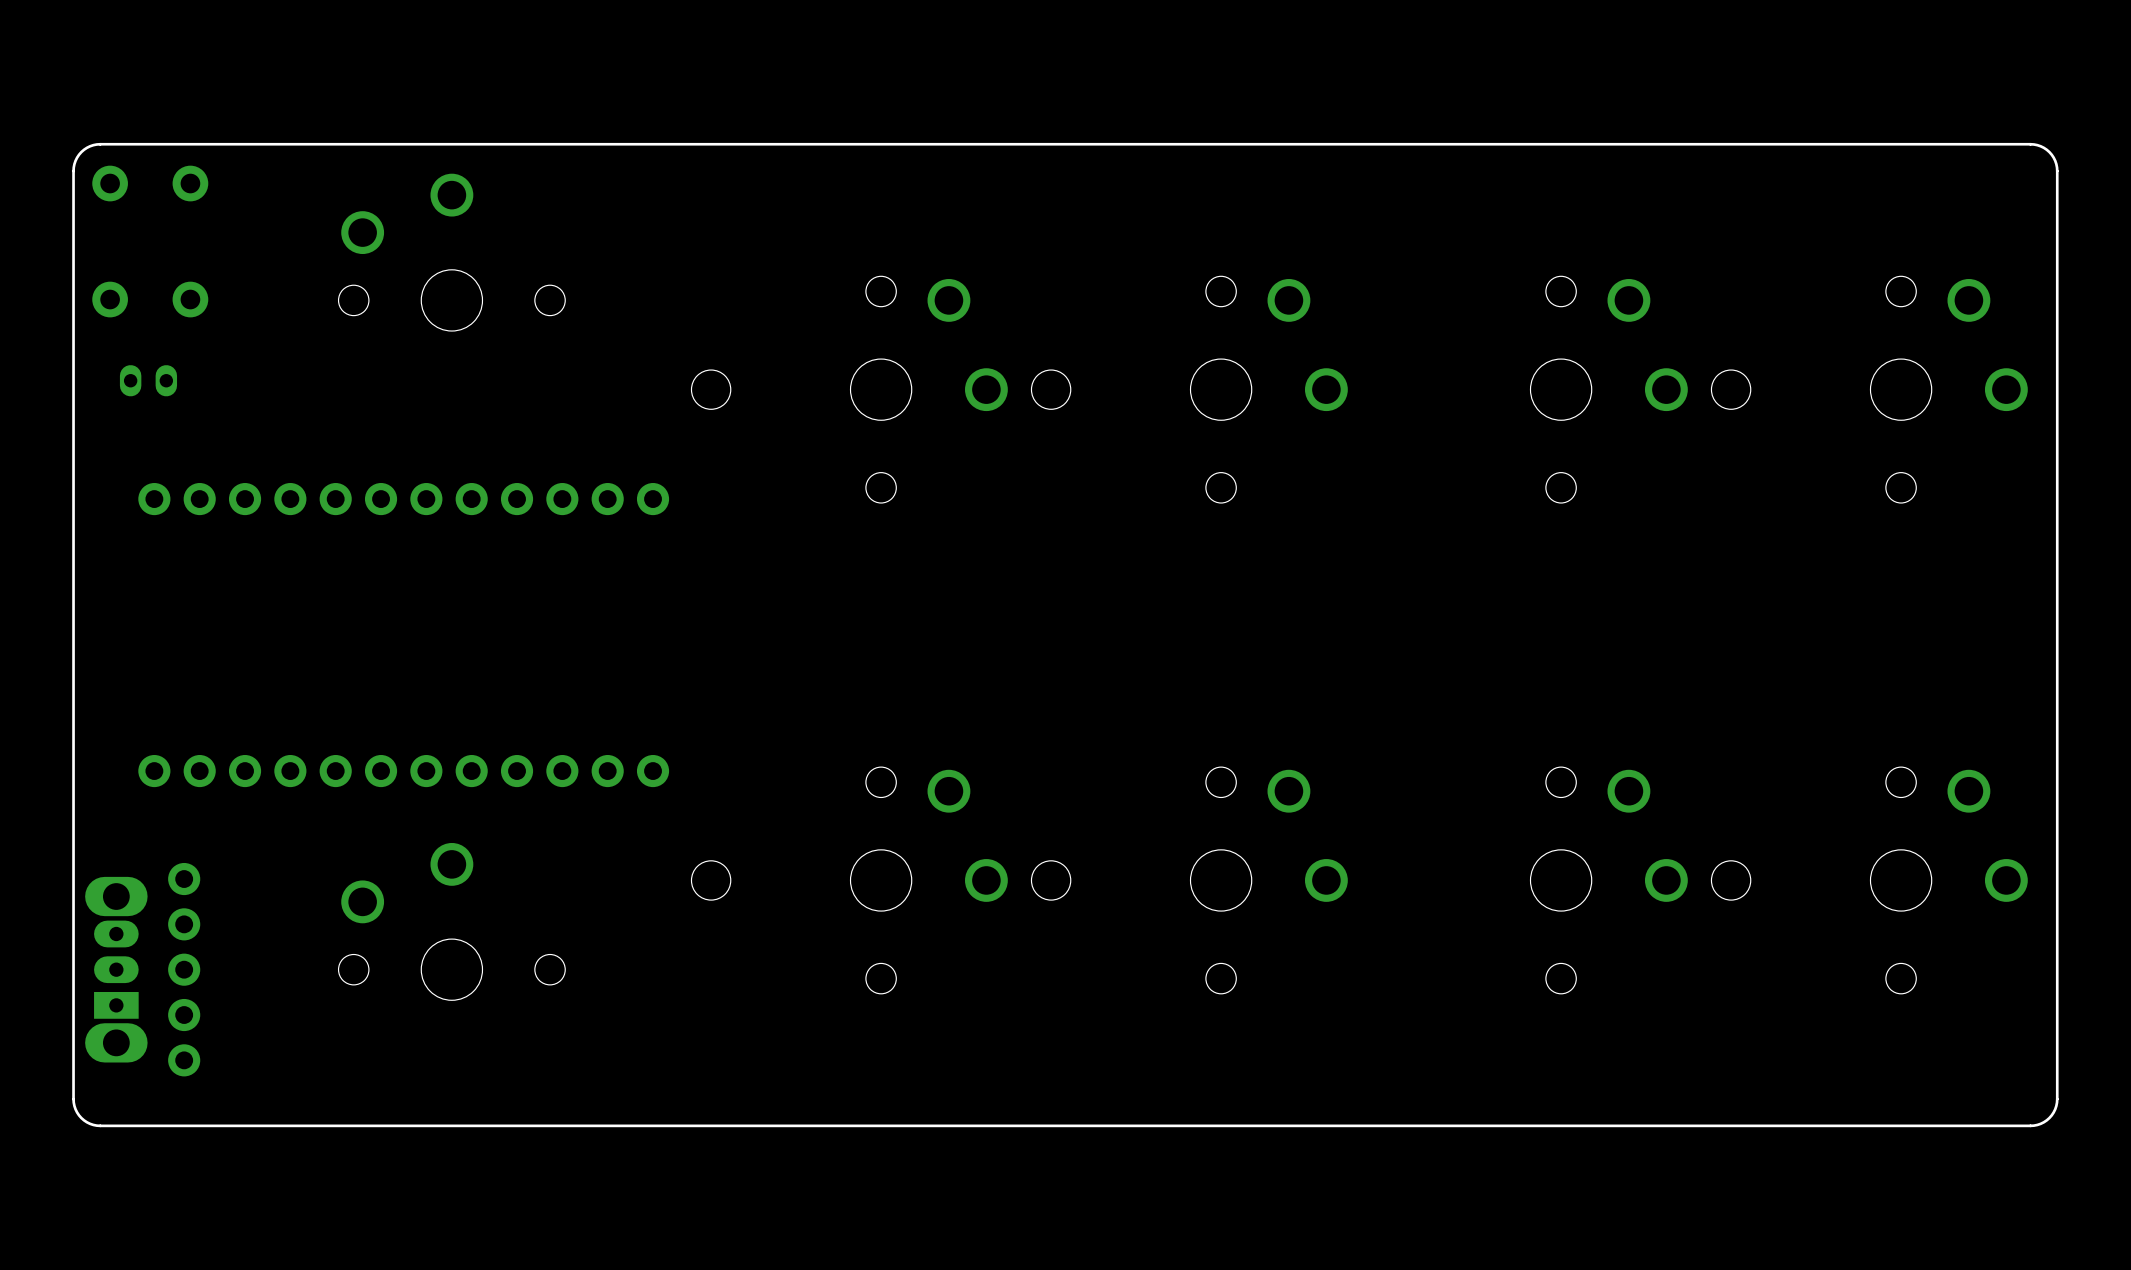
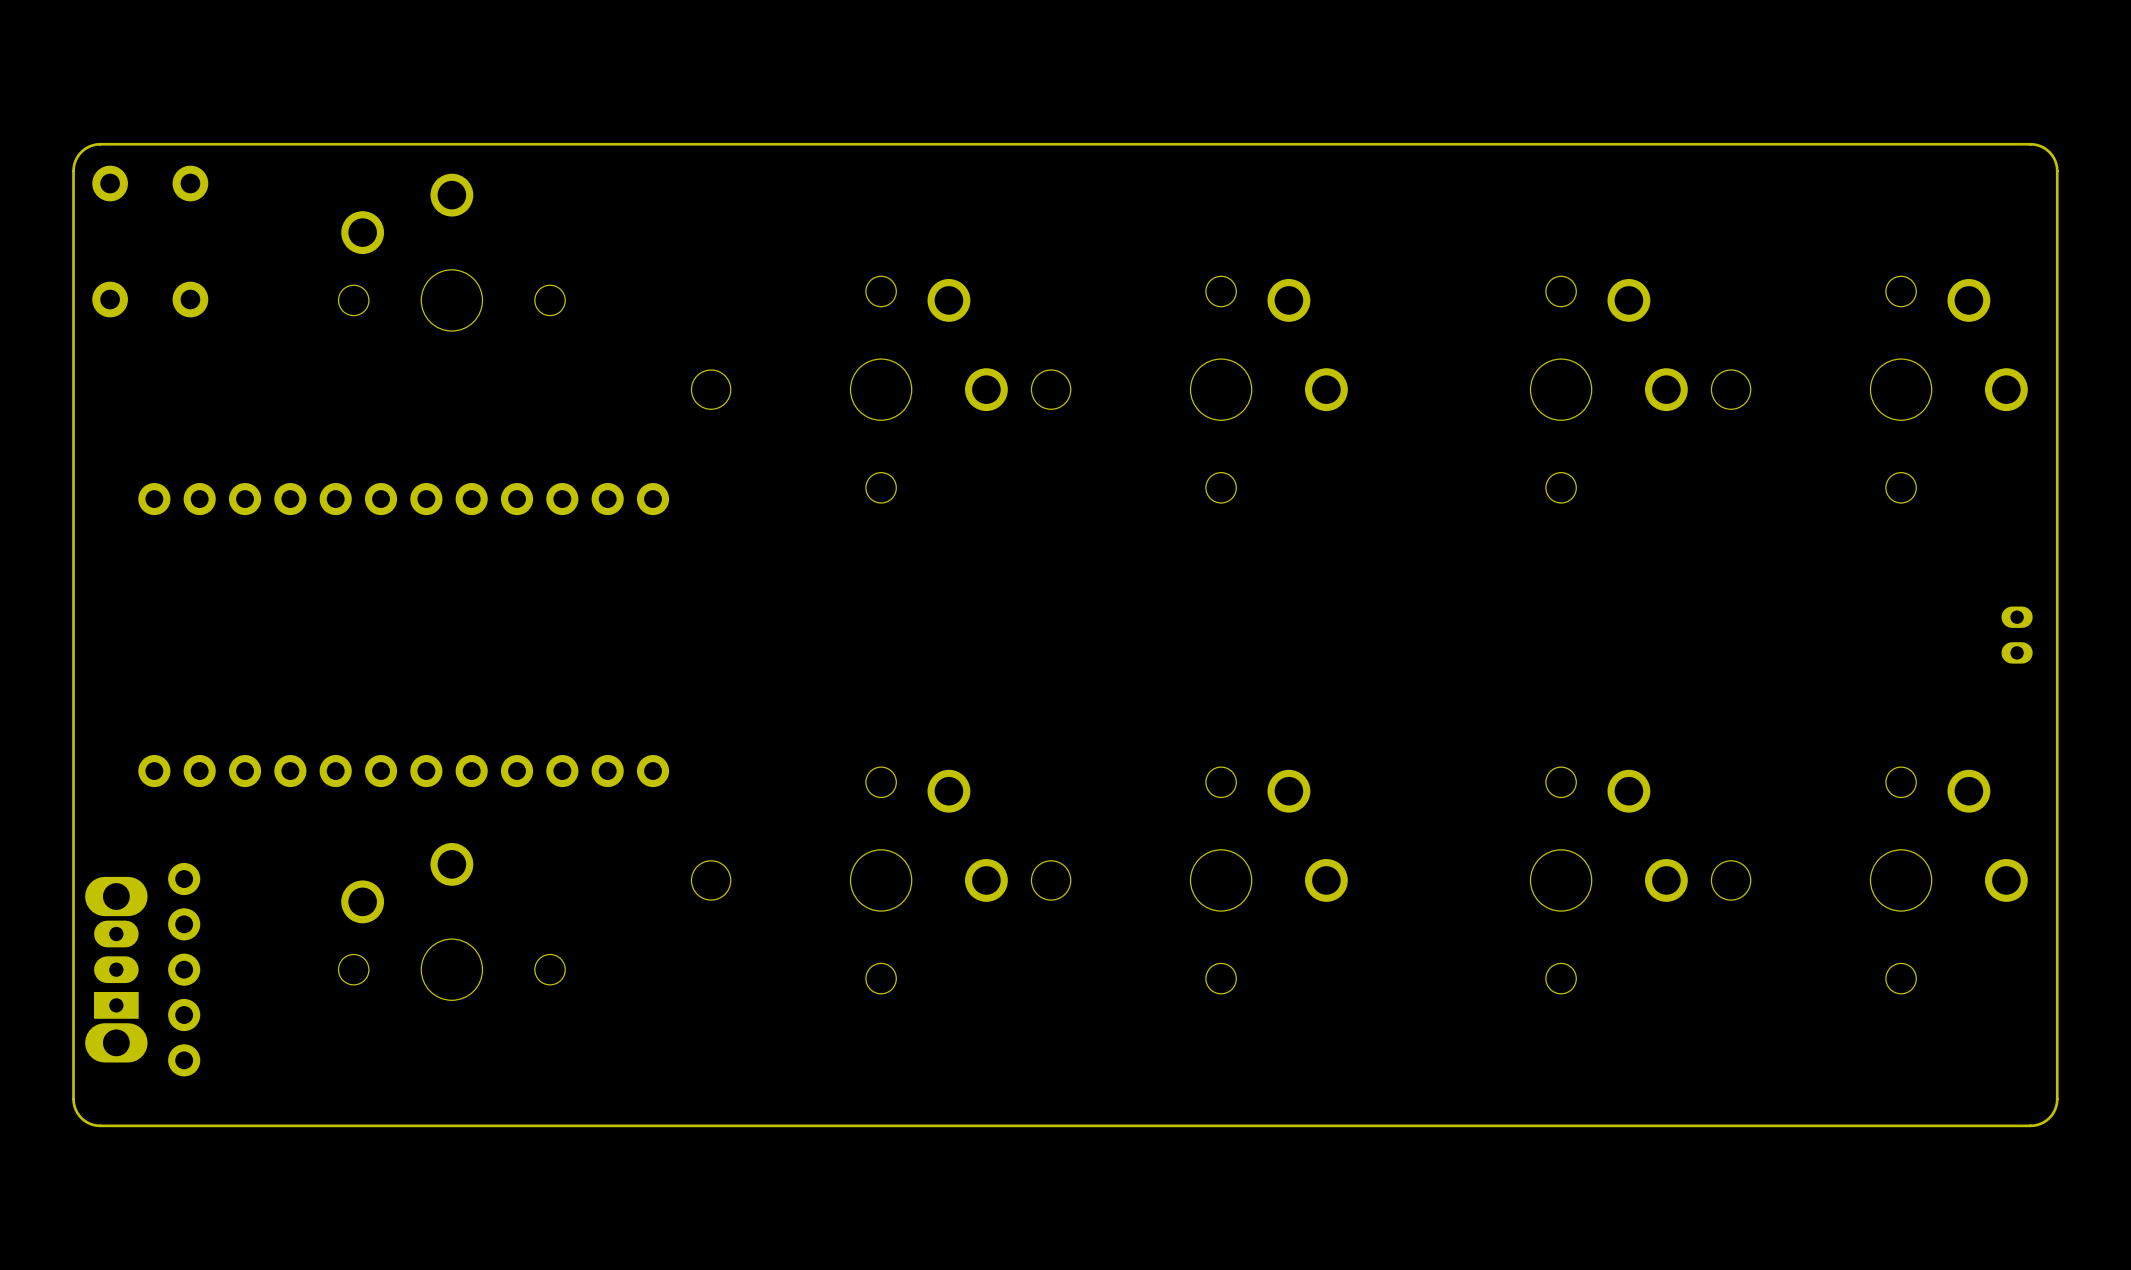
part: (148, 380) -> none
part: none -> (2017, 635)

